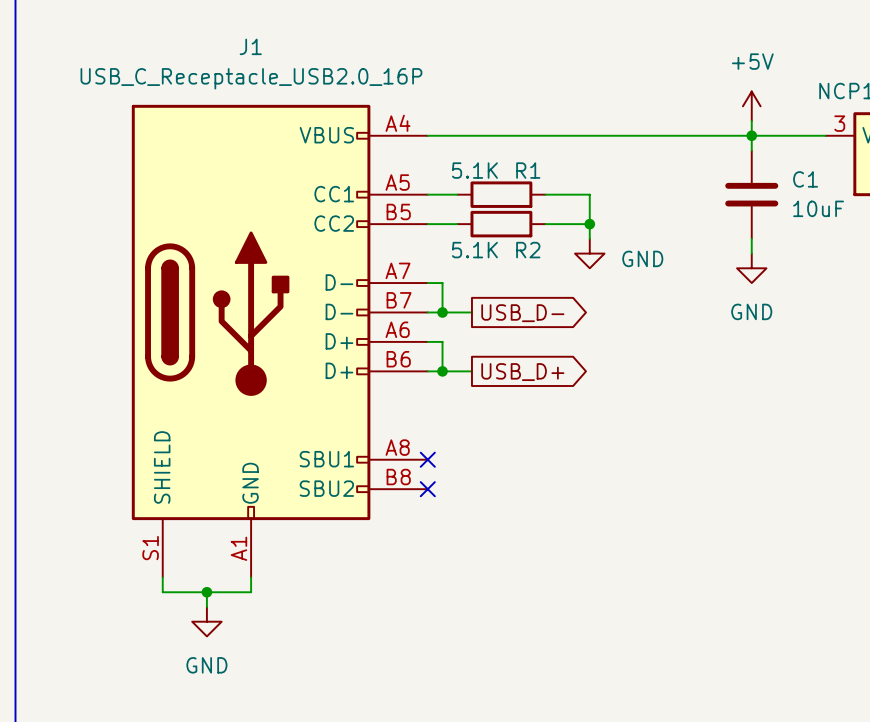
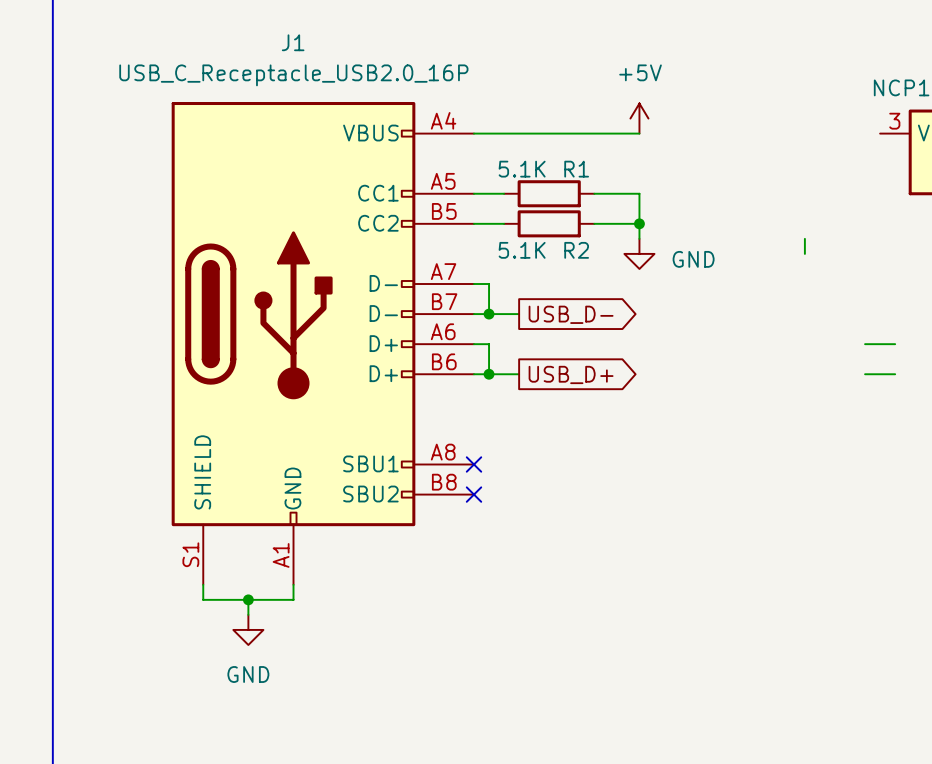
power symbol position: +5V (751, 106) -> +5V (639, 118)
wire: (751, 121) (751, 150) -> none
wire: (589, 135) (825, 135) -> none
junction: (751, 135) -> none
C1: 10uF (751, 194) -> none
power symbol: GND (751, 268) -> none
wire: none -> (865, 344) (895, 344)
wire: none -> (865, 374) (895, 374)

